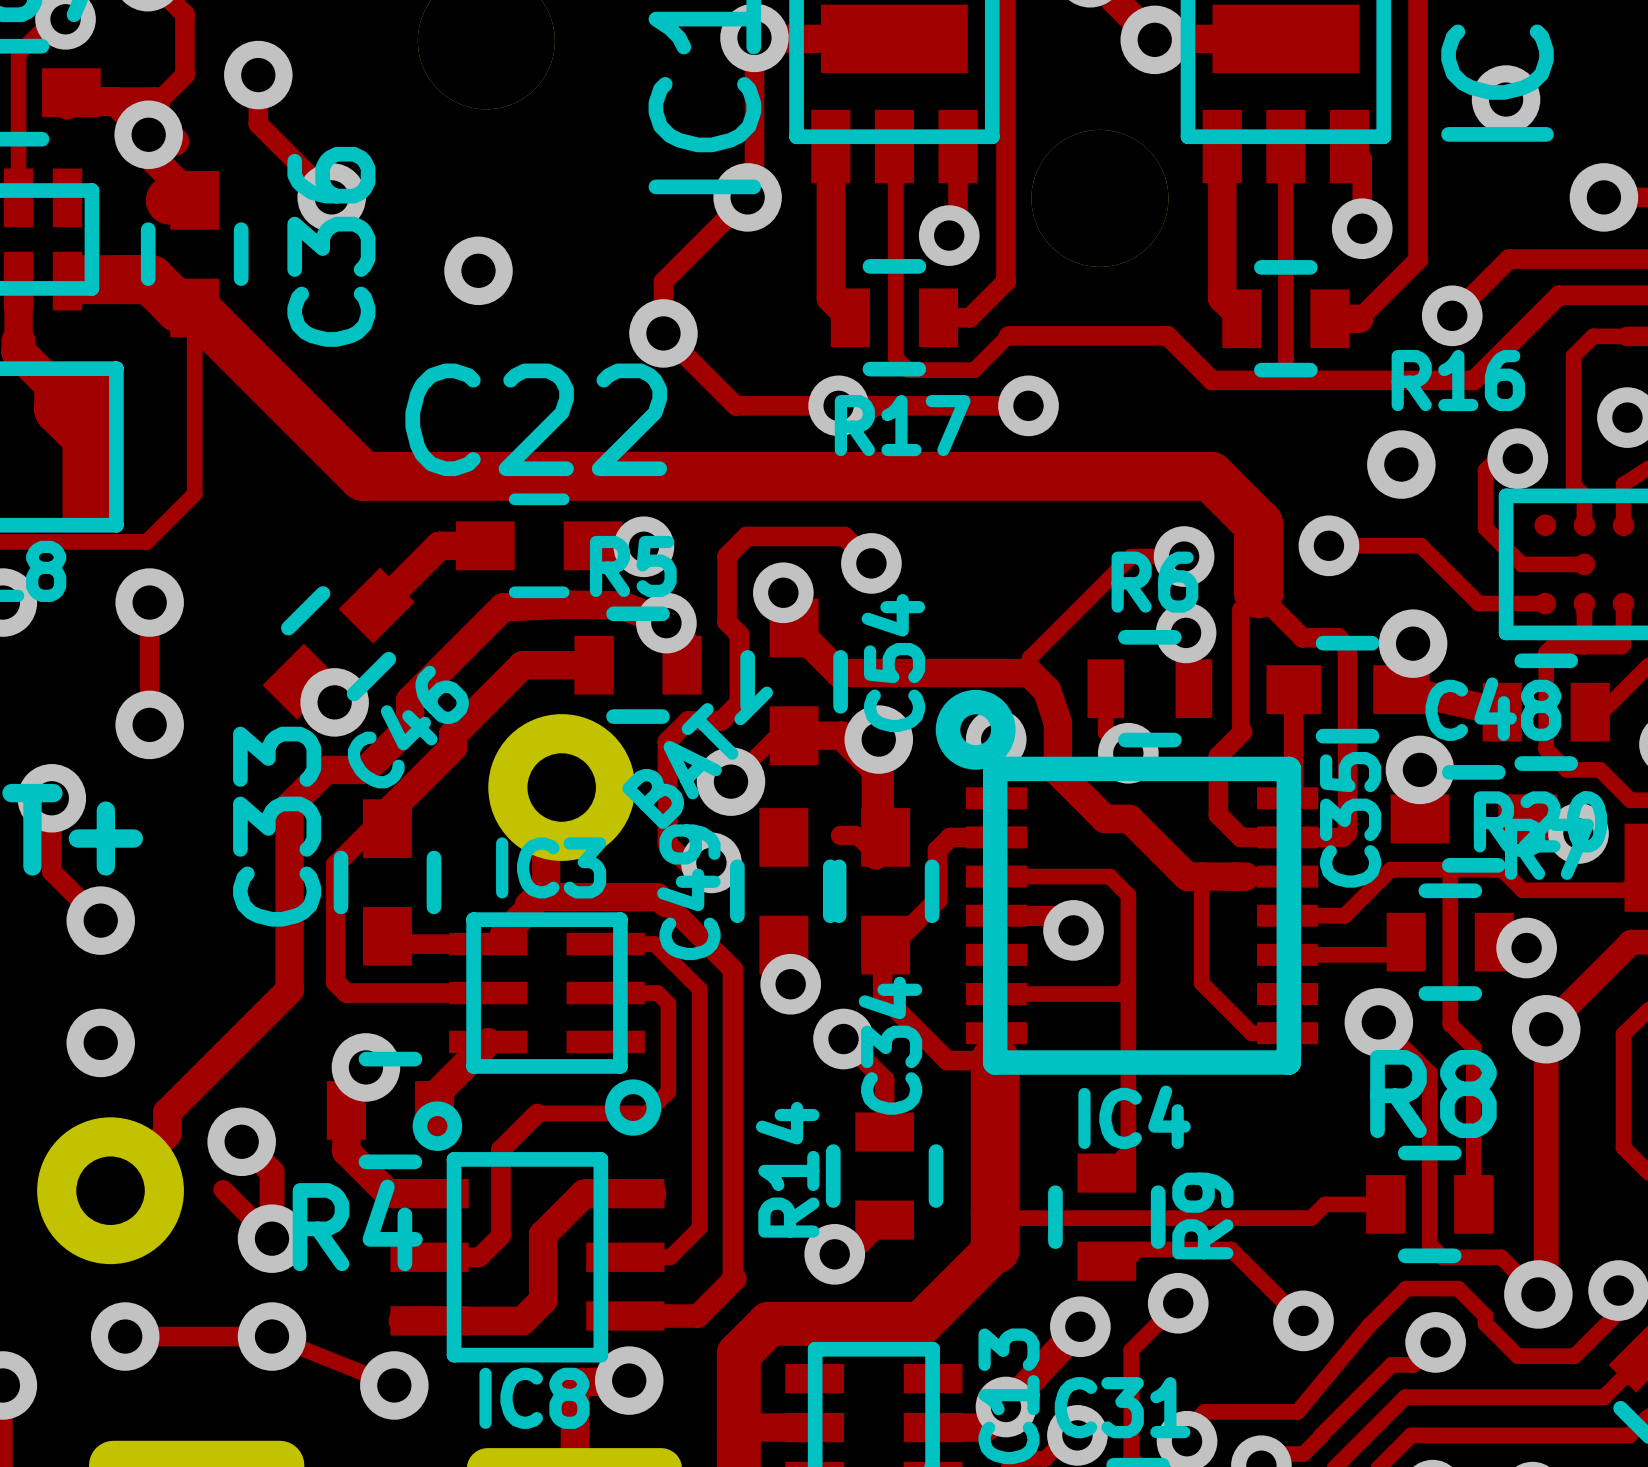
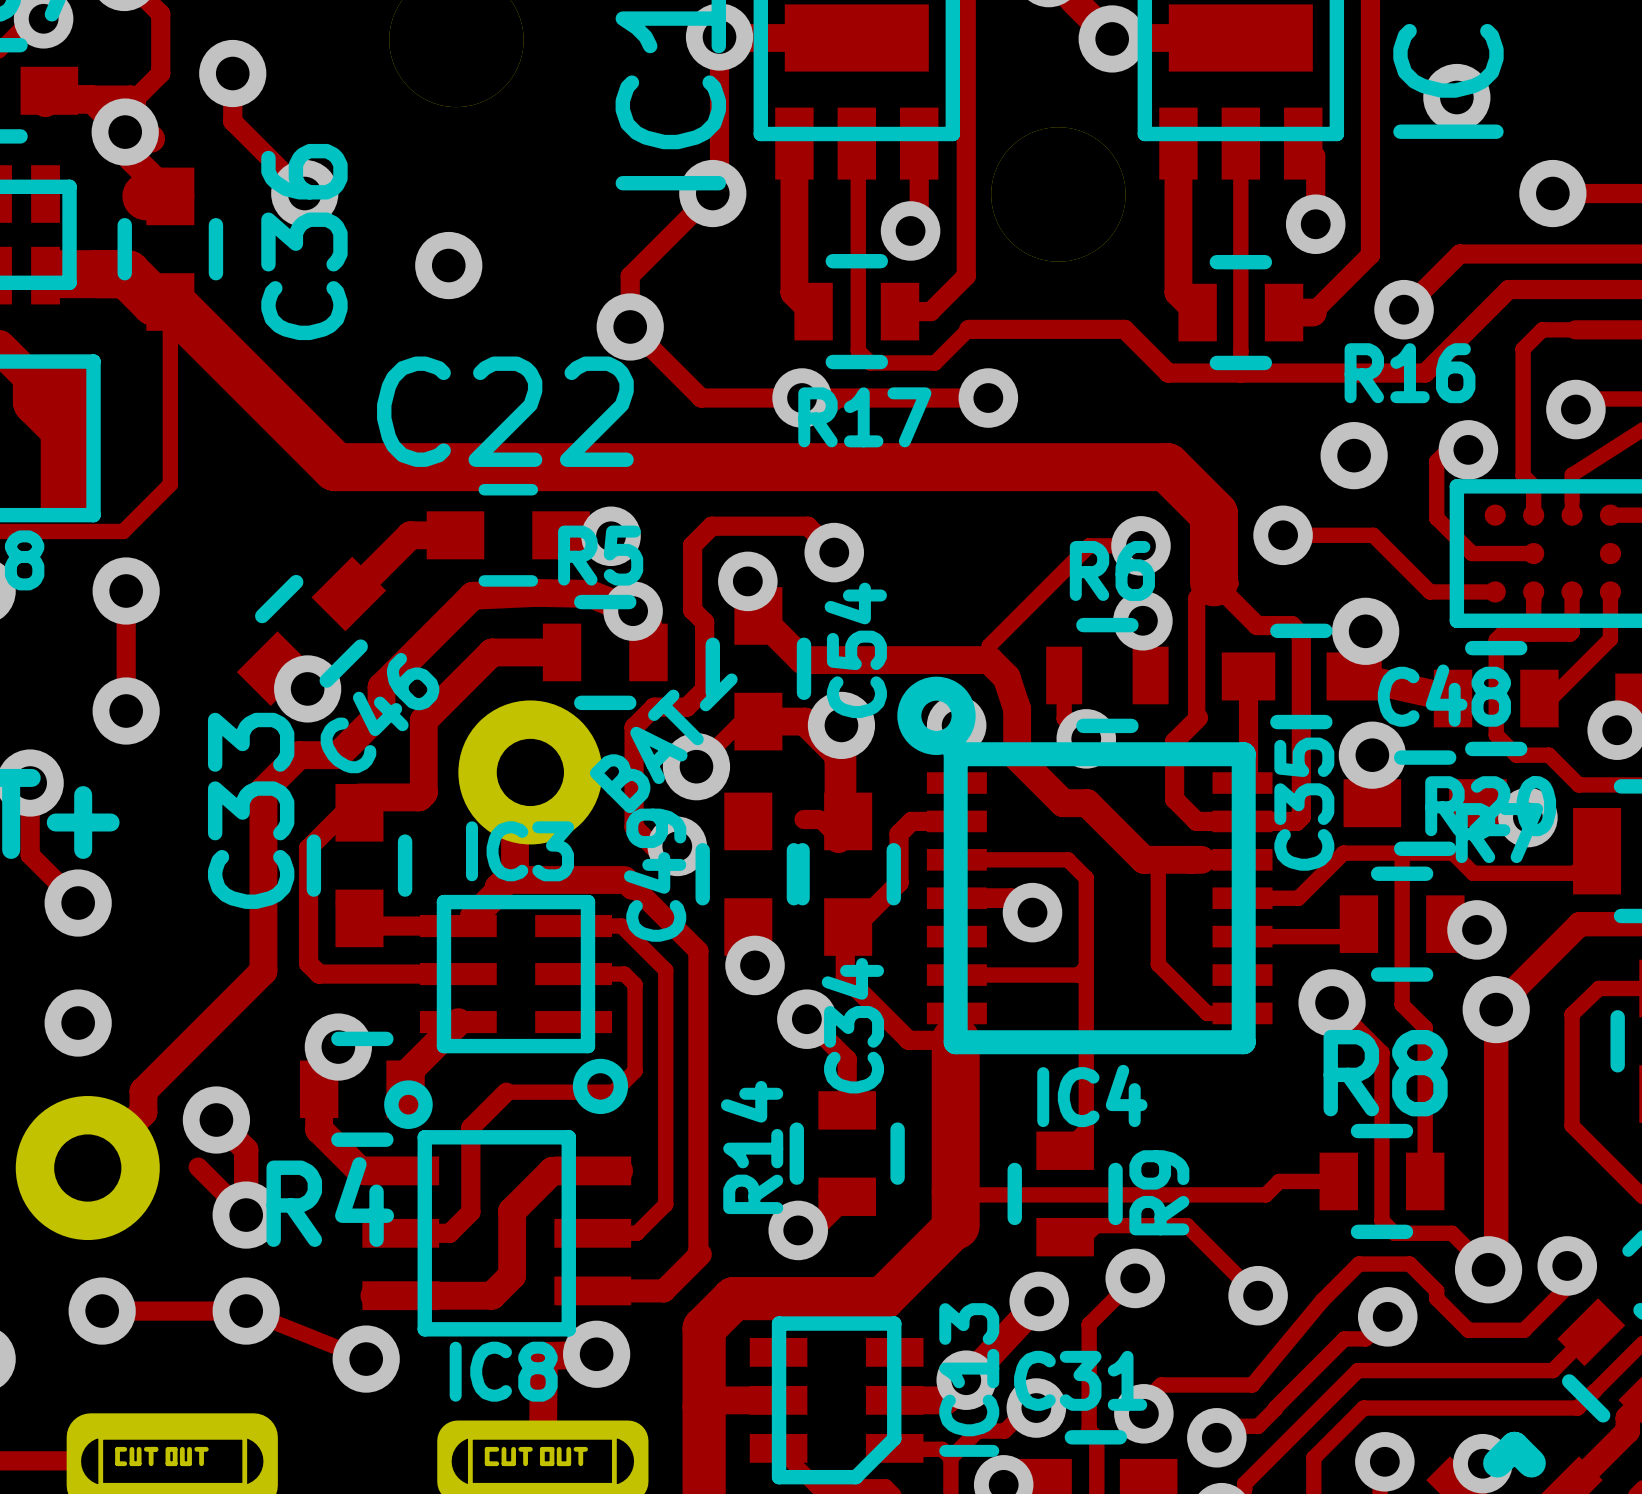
track: (453, 747) (387, 812) -> (423, 733) (423, 792) (419, 797) (359, 797)

